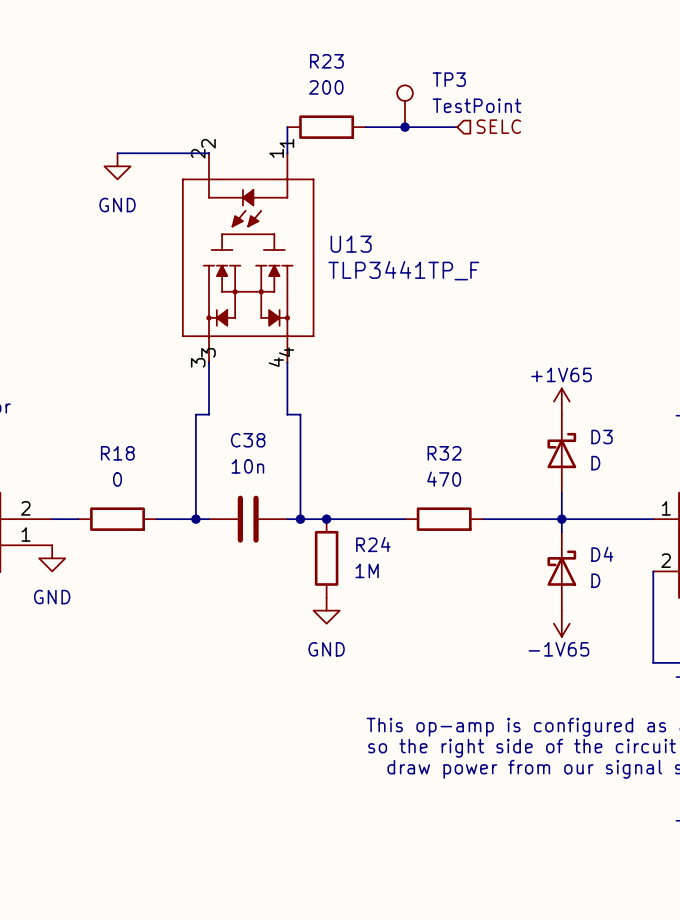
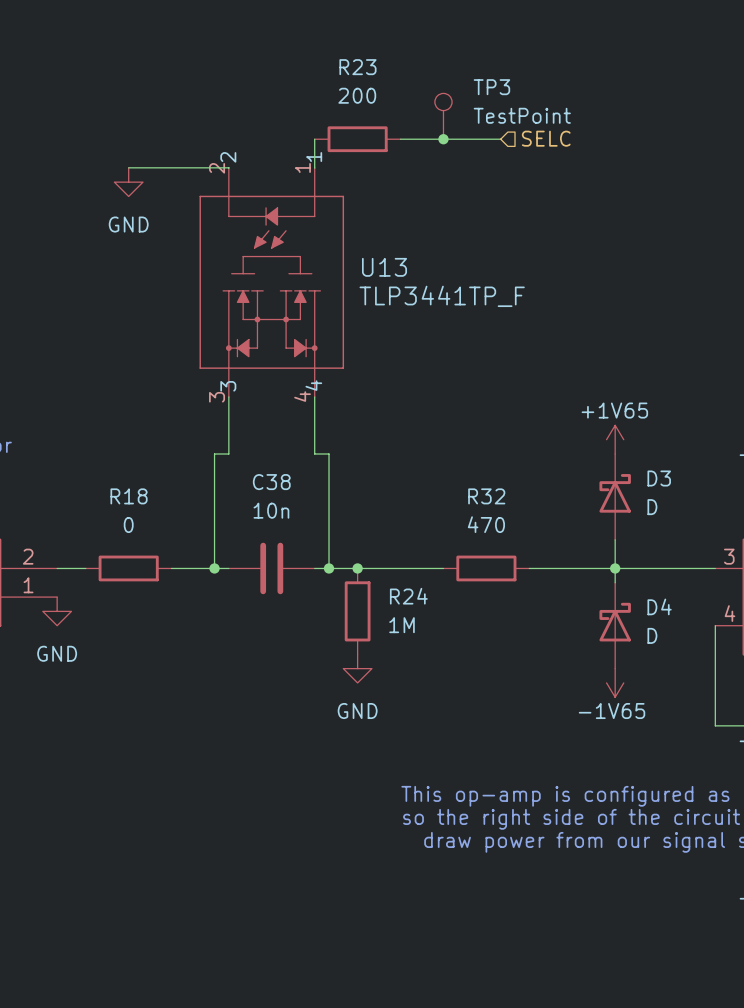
part pin number: 1 (666, 508) -> 3 (729, 556)
part pin number: 2 (666, 560) -> 4 (729, 613)

